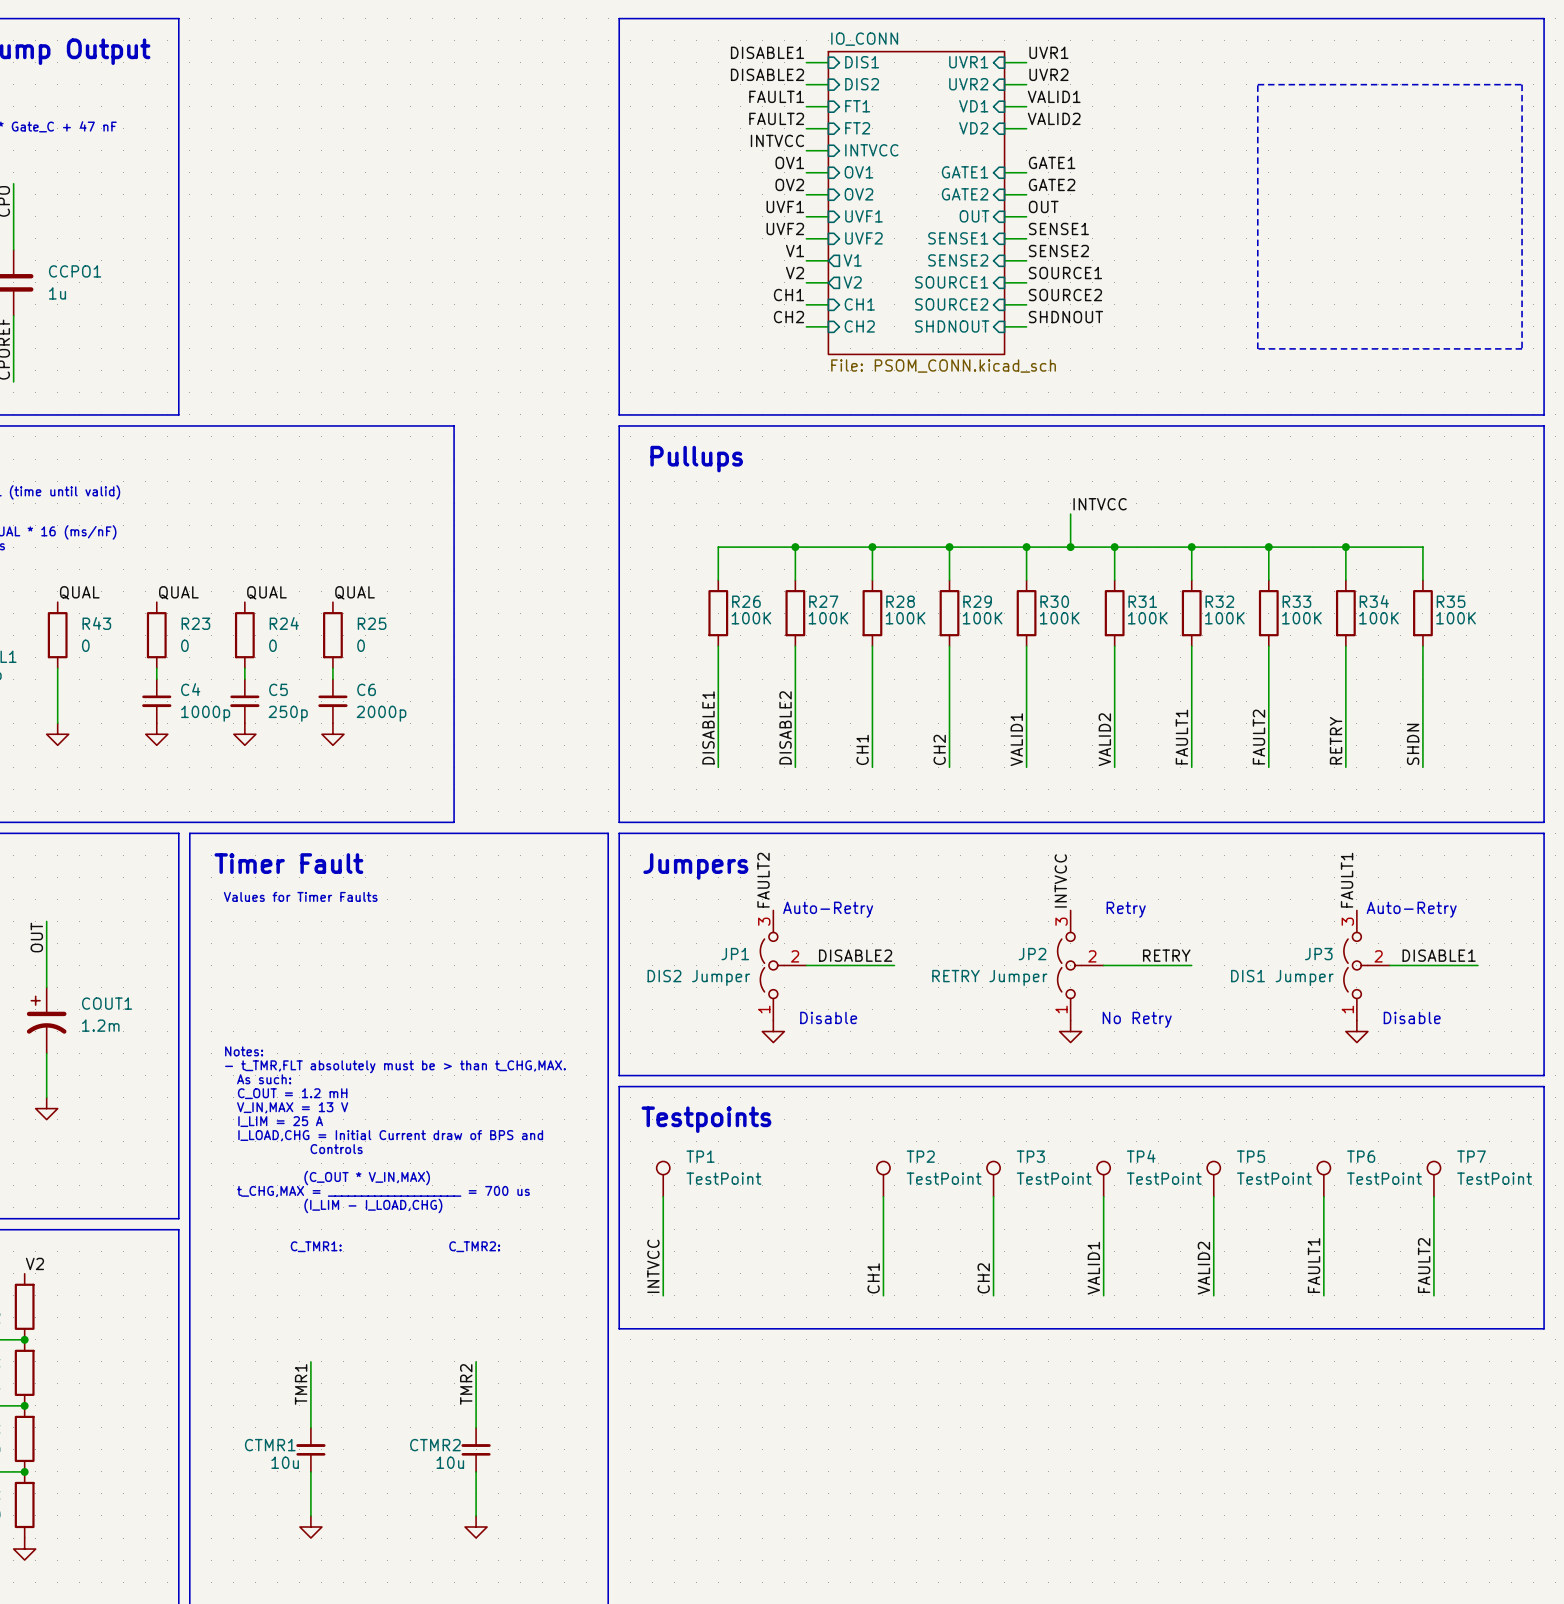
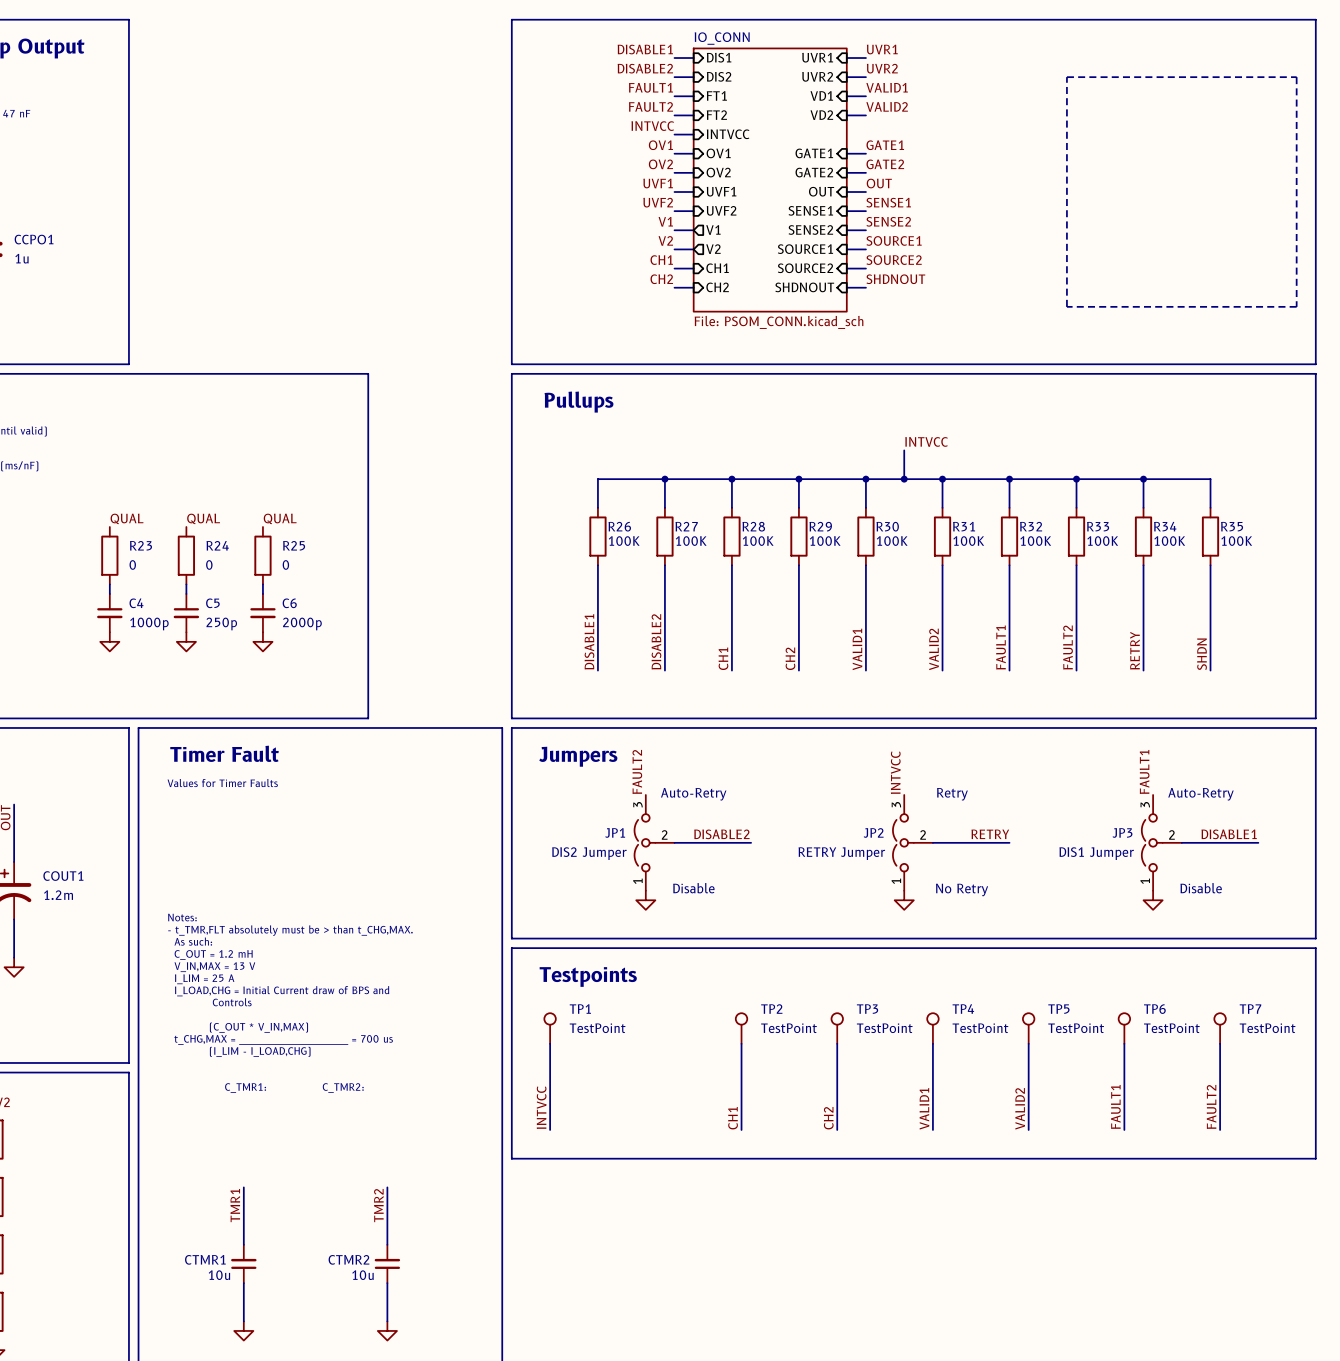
label: QUAL (79, 592) -> none
R43: 0 (57, 635) -> none
wire: (57, 668) (57, 723) -> none
power symbol: (57, 734) -> none

